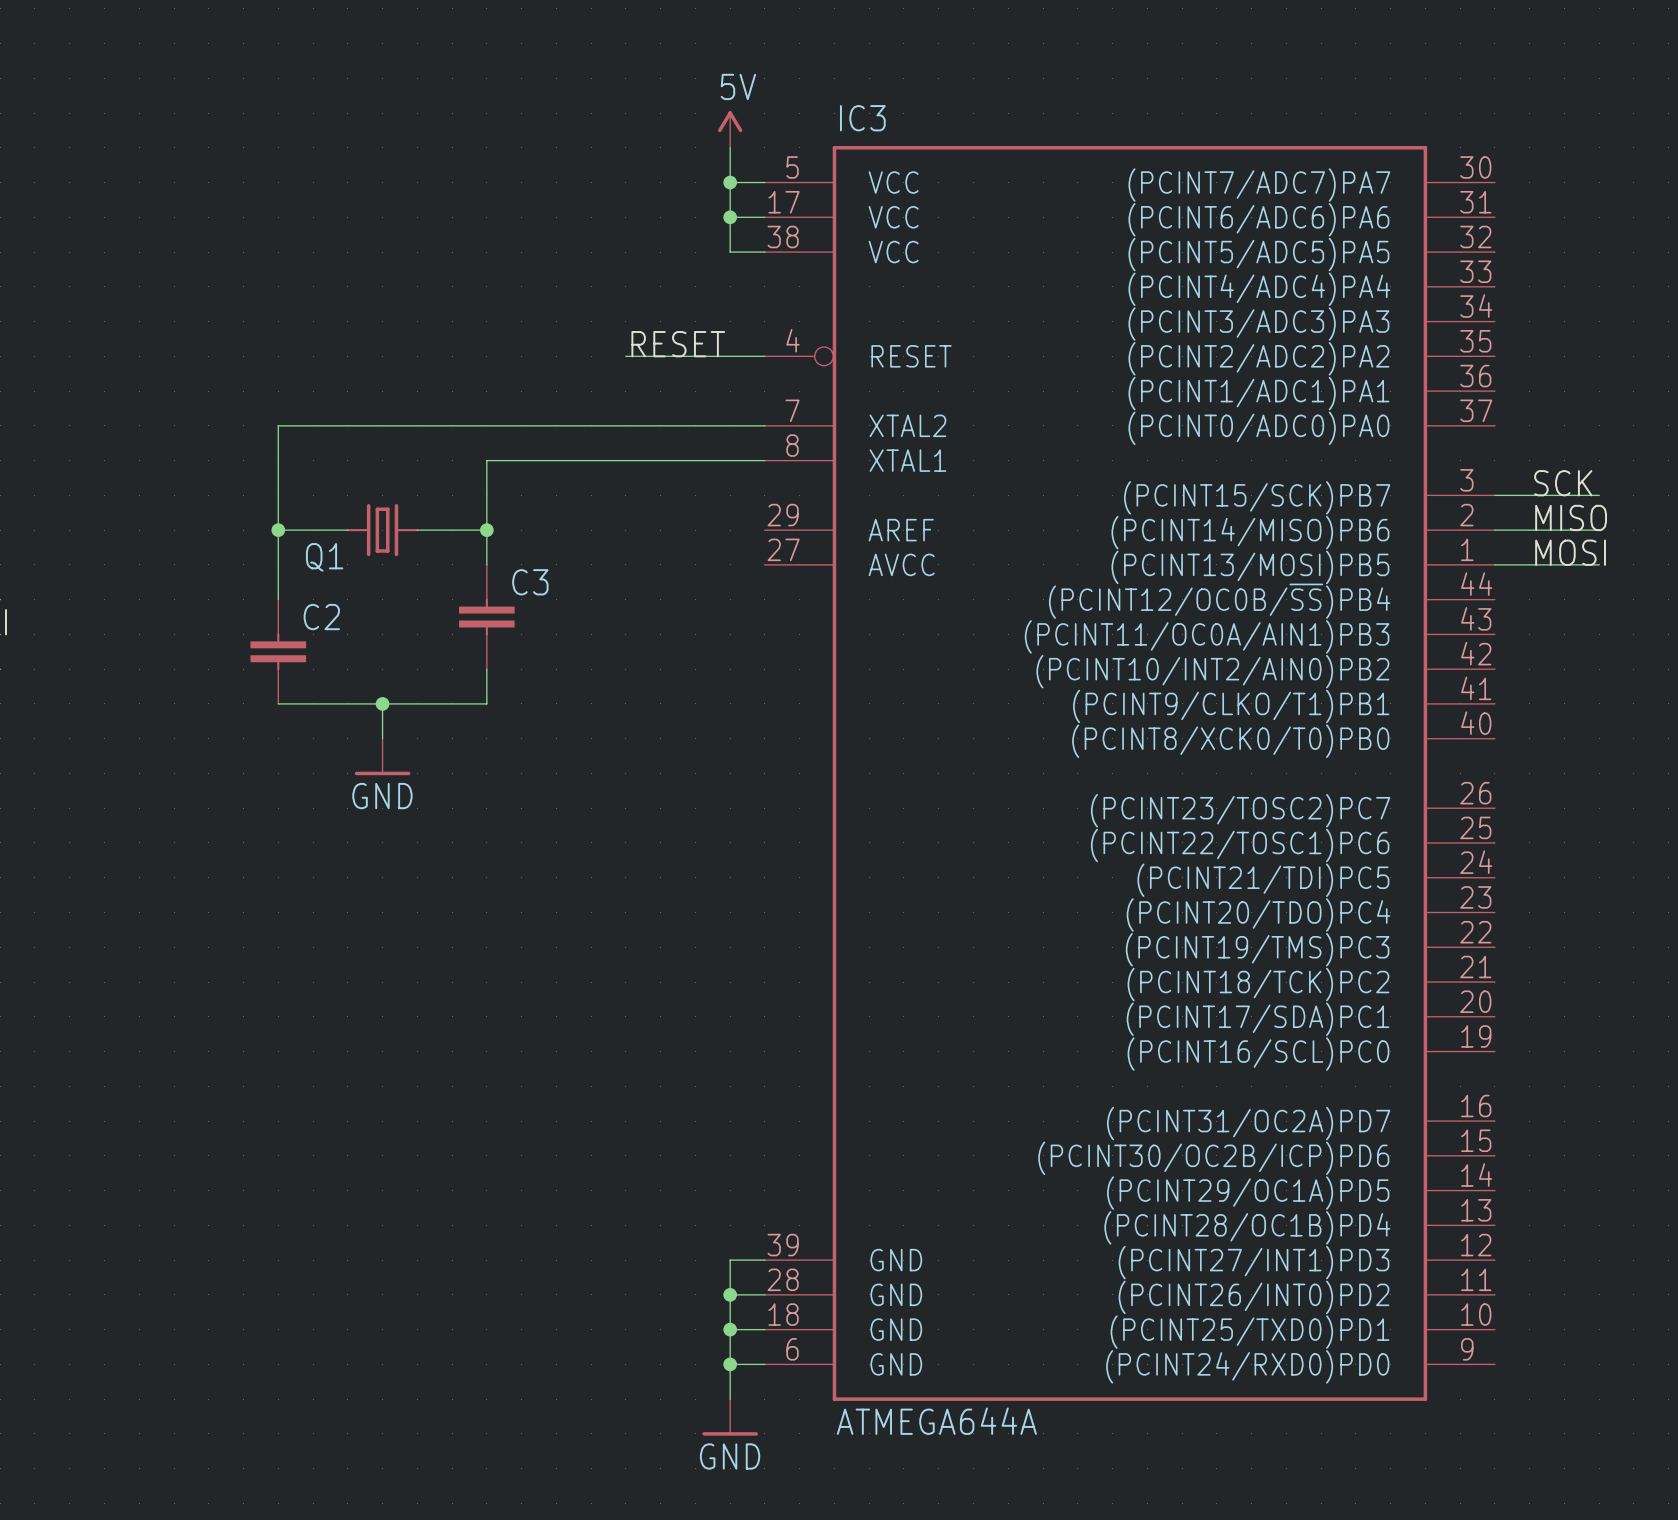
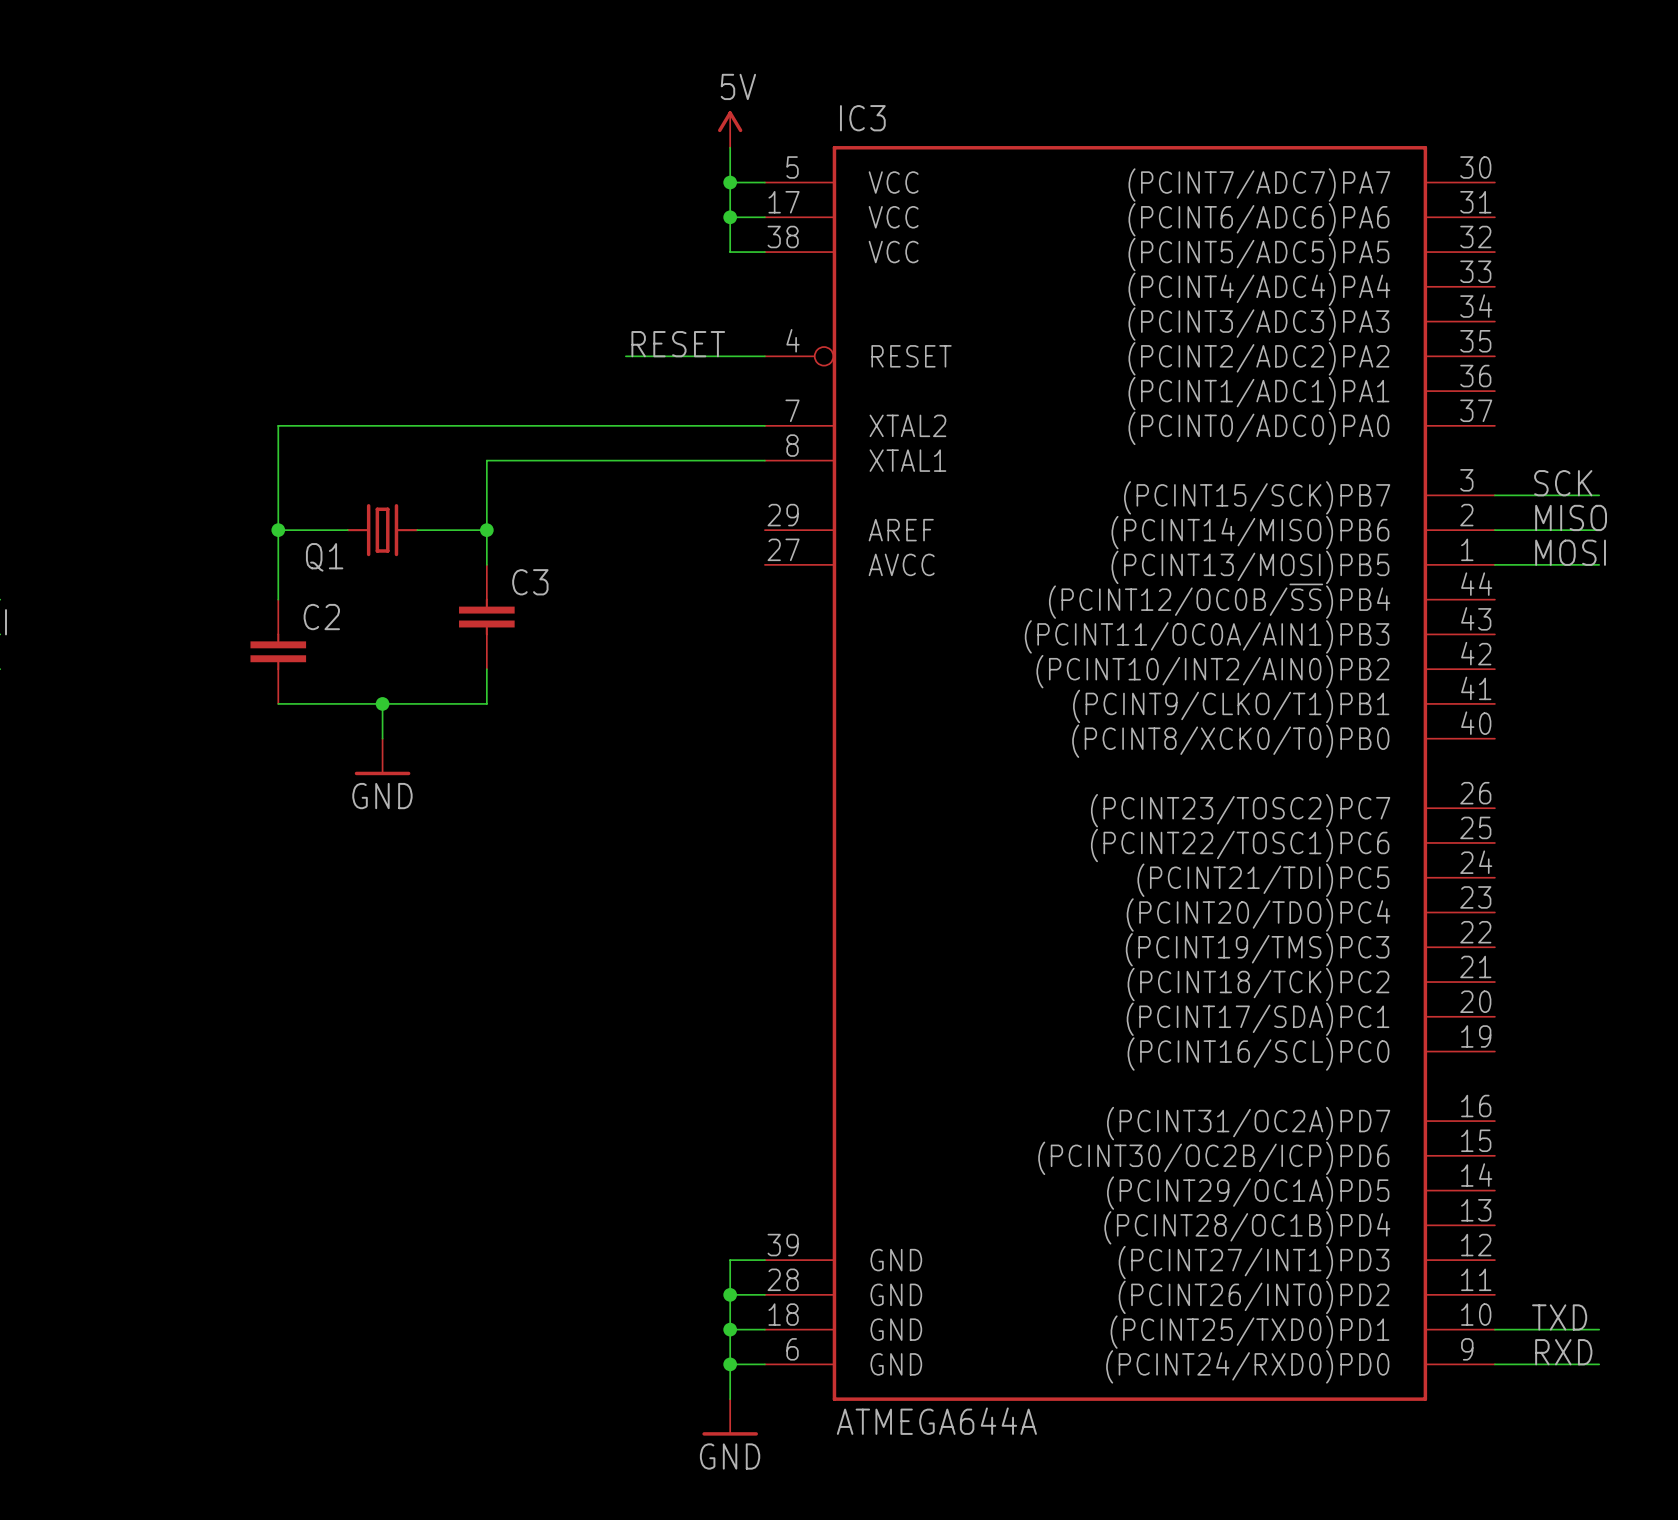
label: none -> TXD (1559, 1317)
wire: none -> (1494, 1329) (1599, 1329)
label: none -> RXD (1563, 1352)
wire: none -> (1494, 1364) (1599, 1364)

